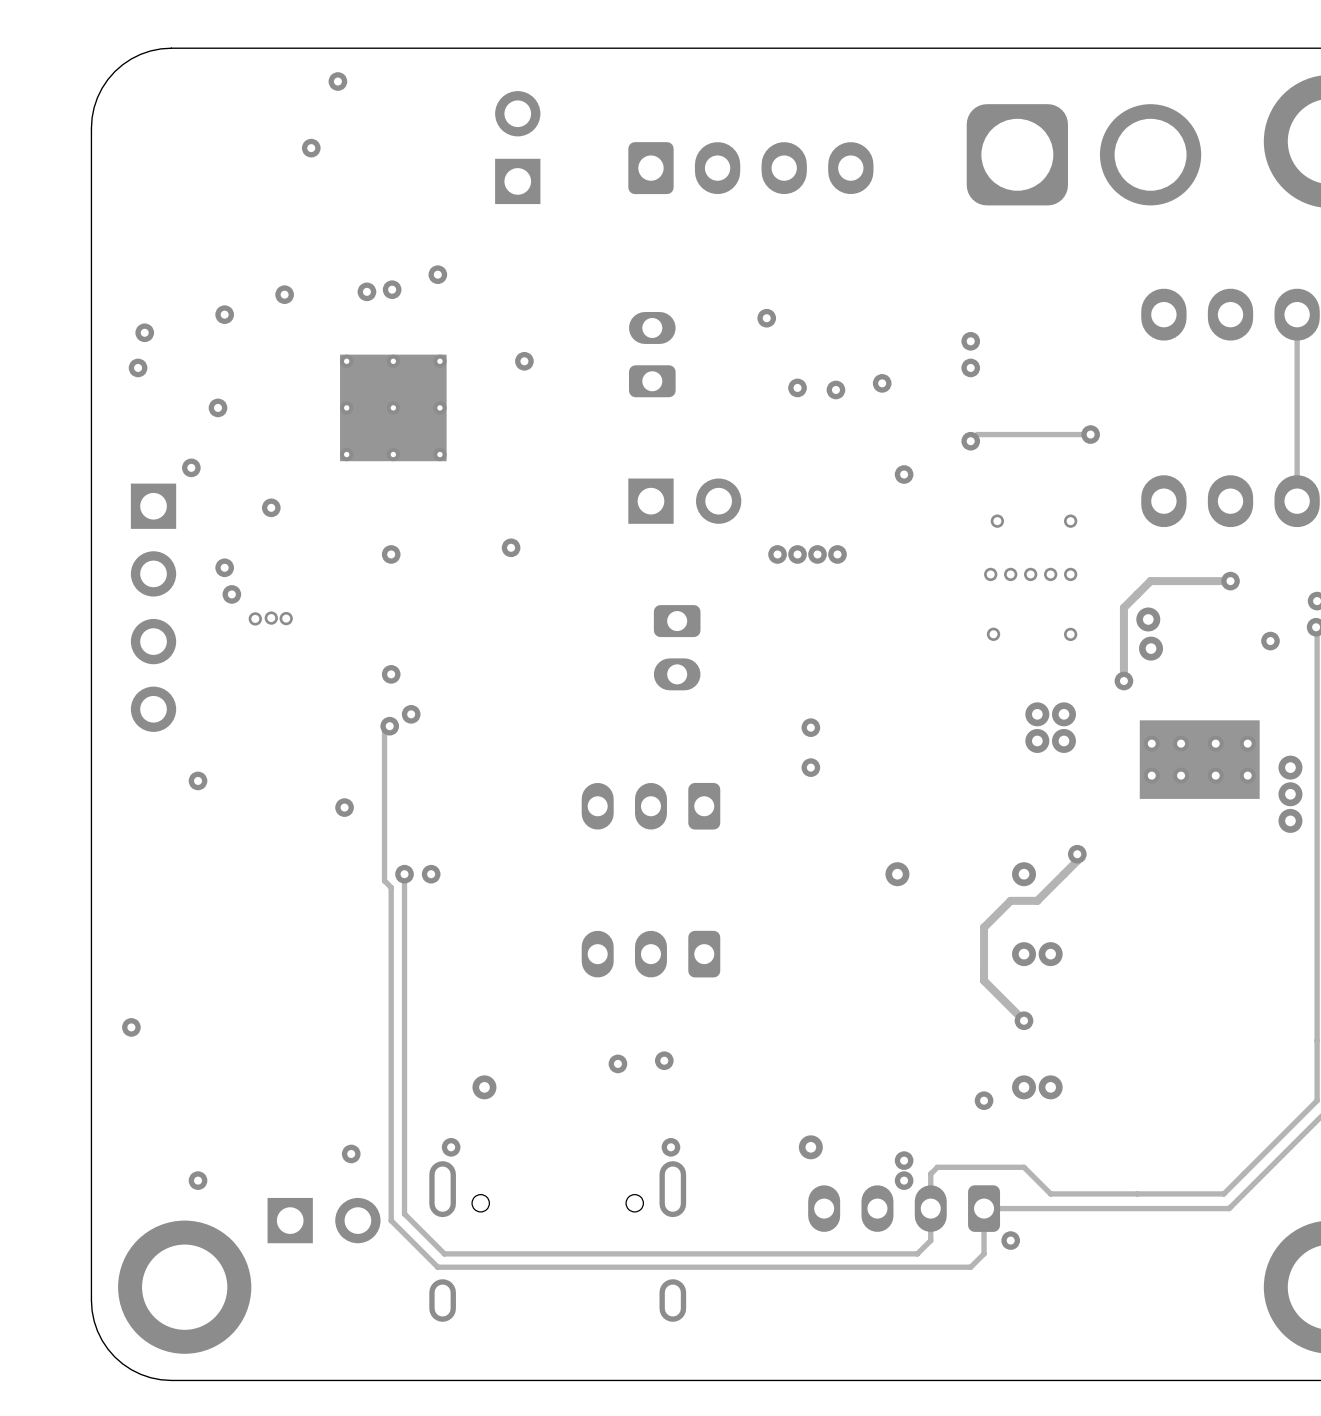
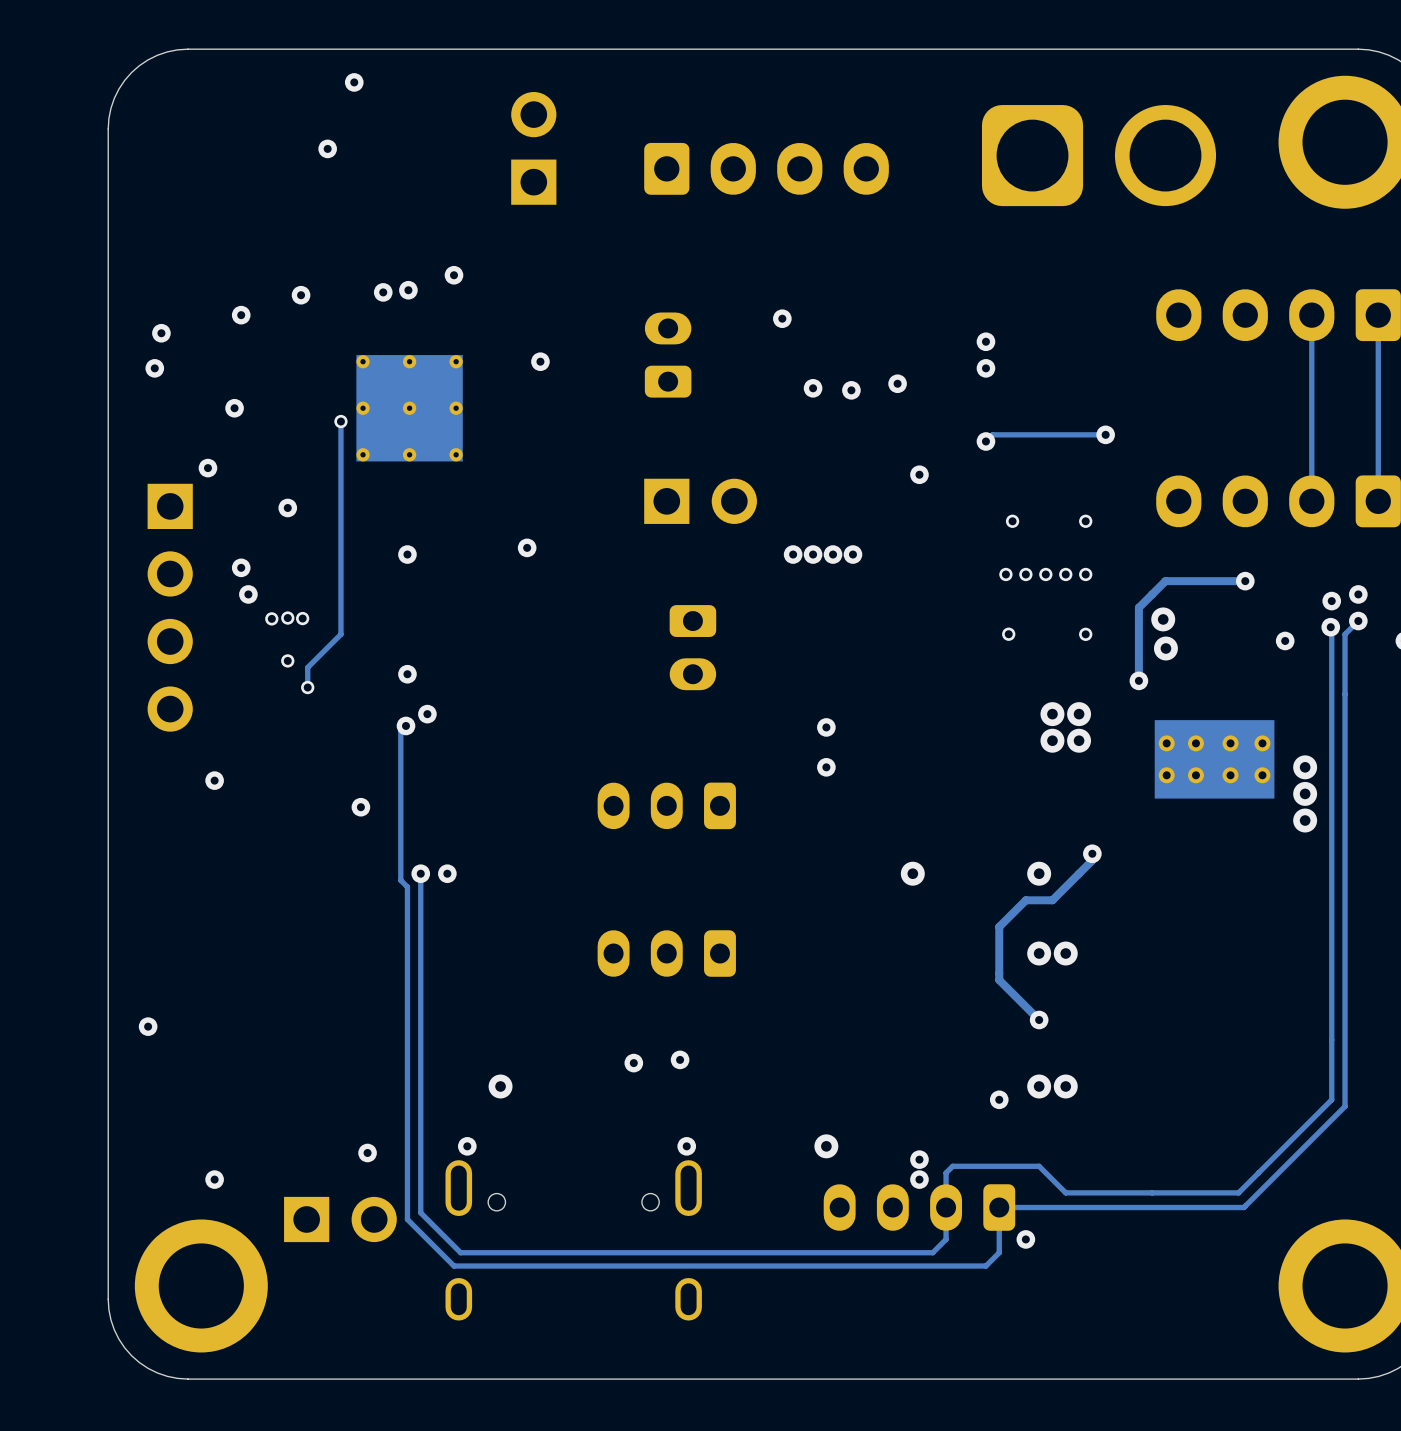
track: none -> (340, 421) (340, 634) (307, 667) (307, 687)
via: none -> (340, 421)
via: none -> (287, 660)
via: none -> (307, 687)

